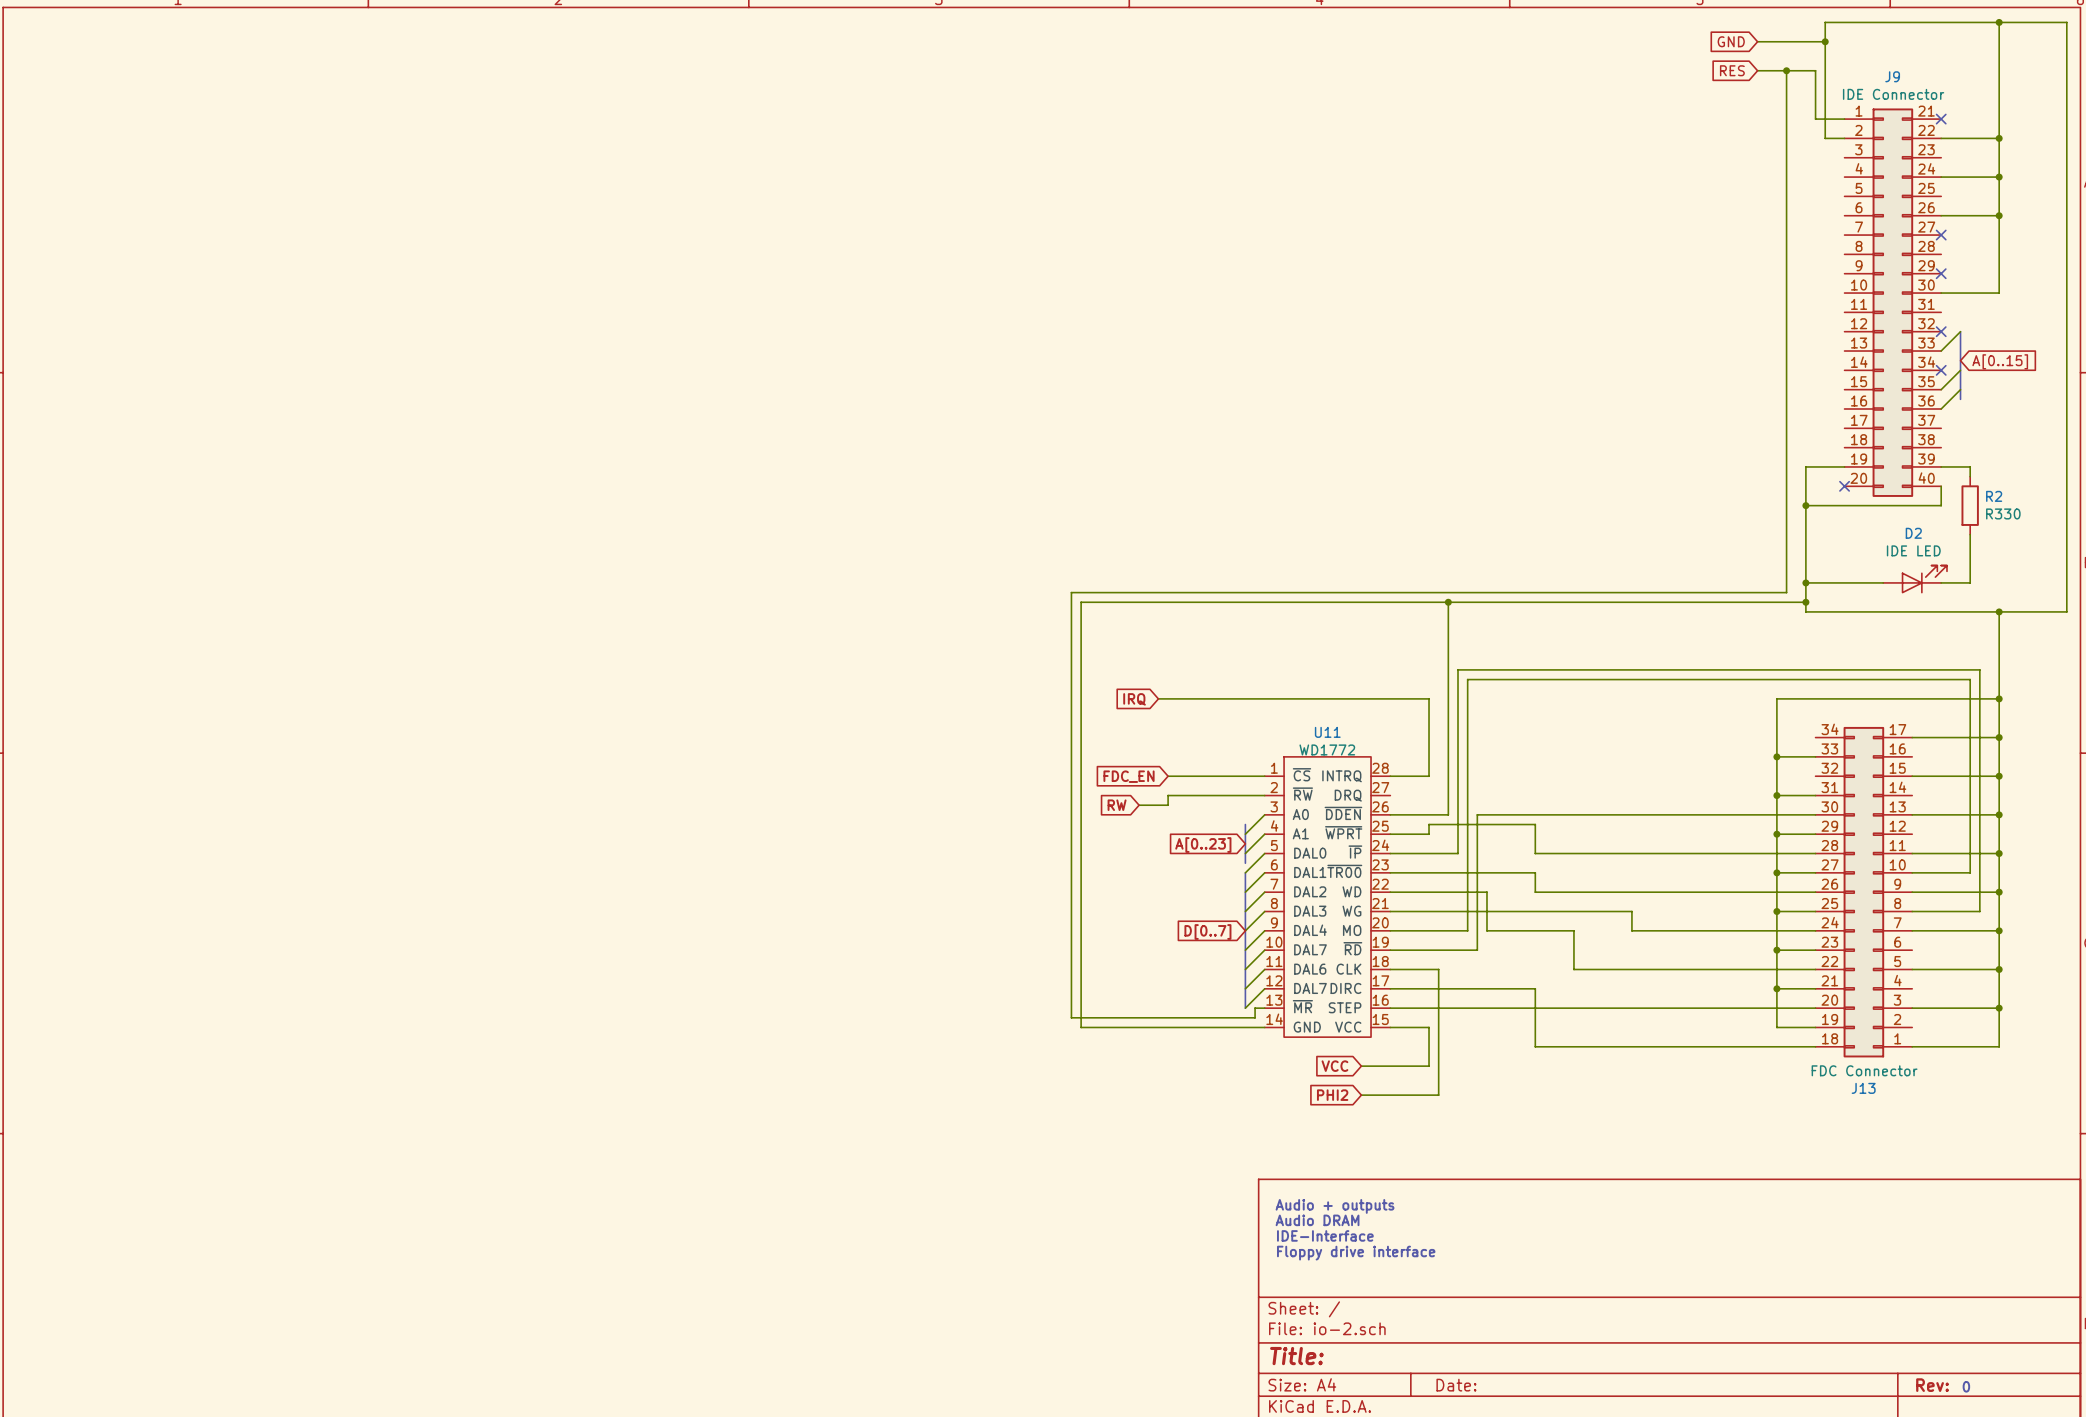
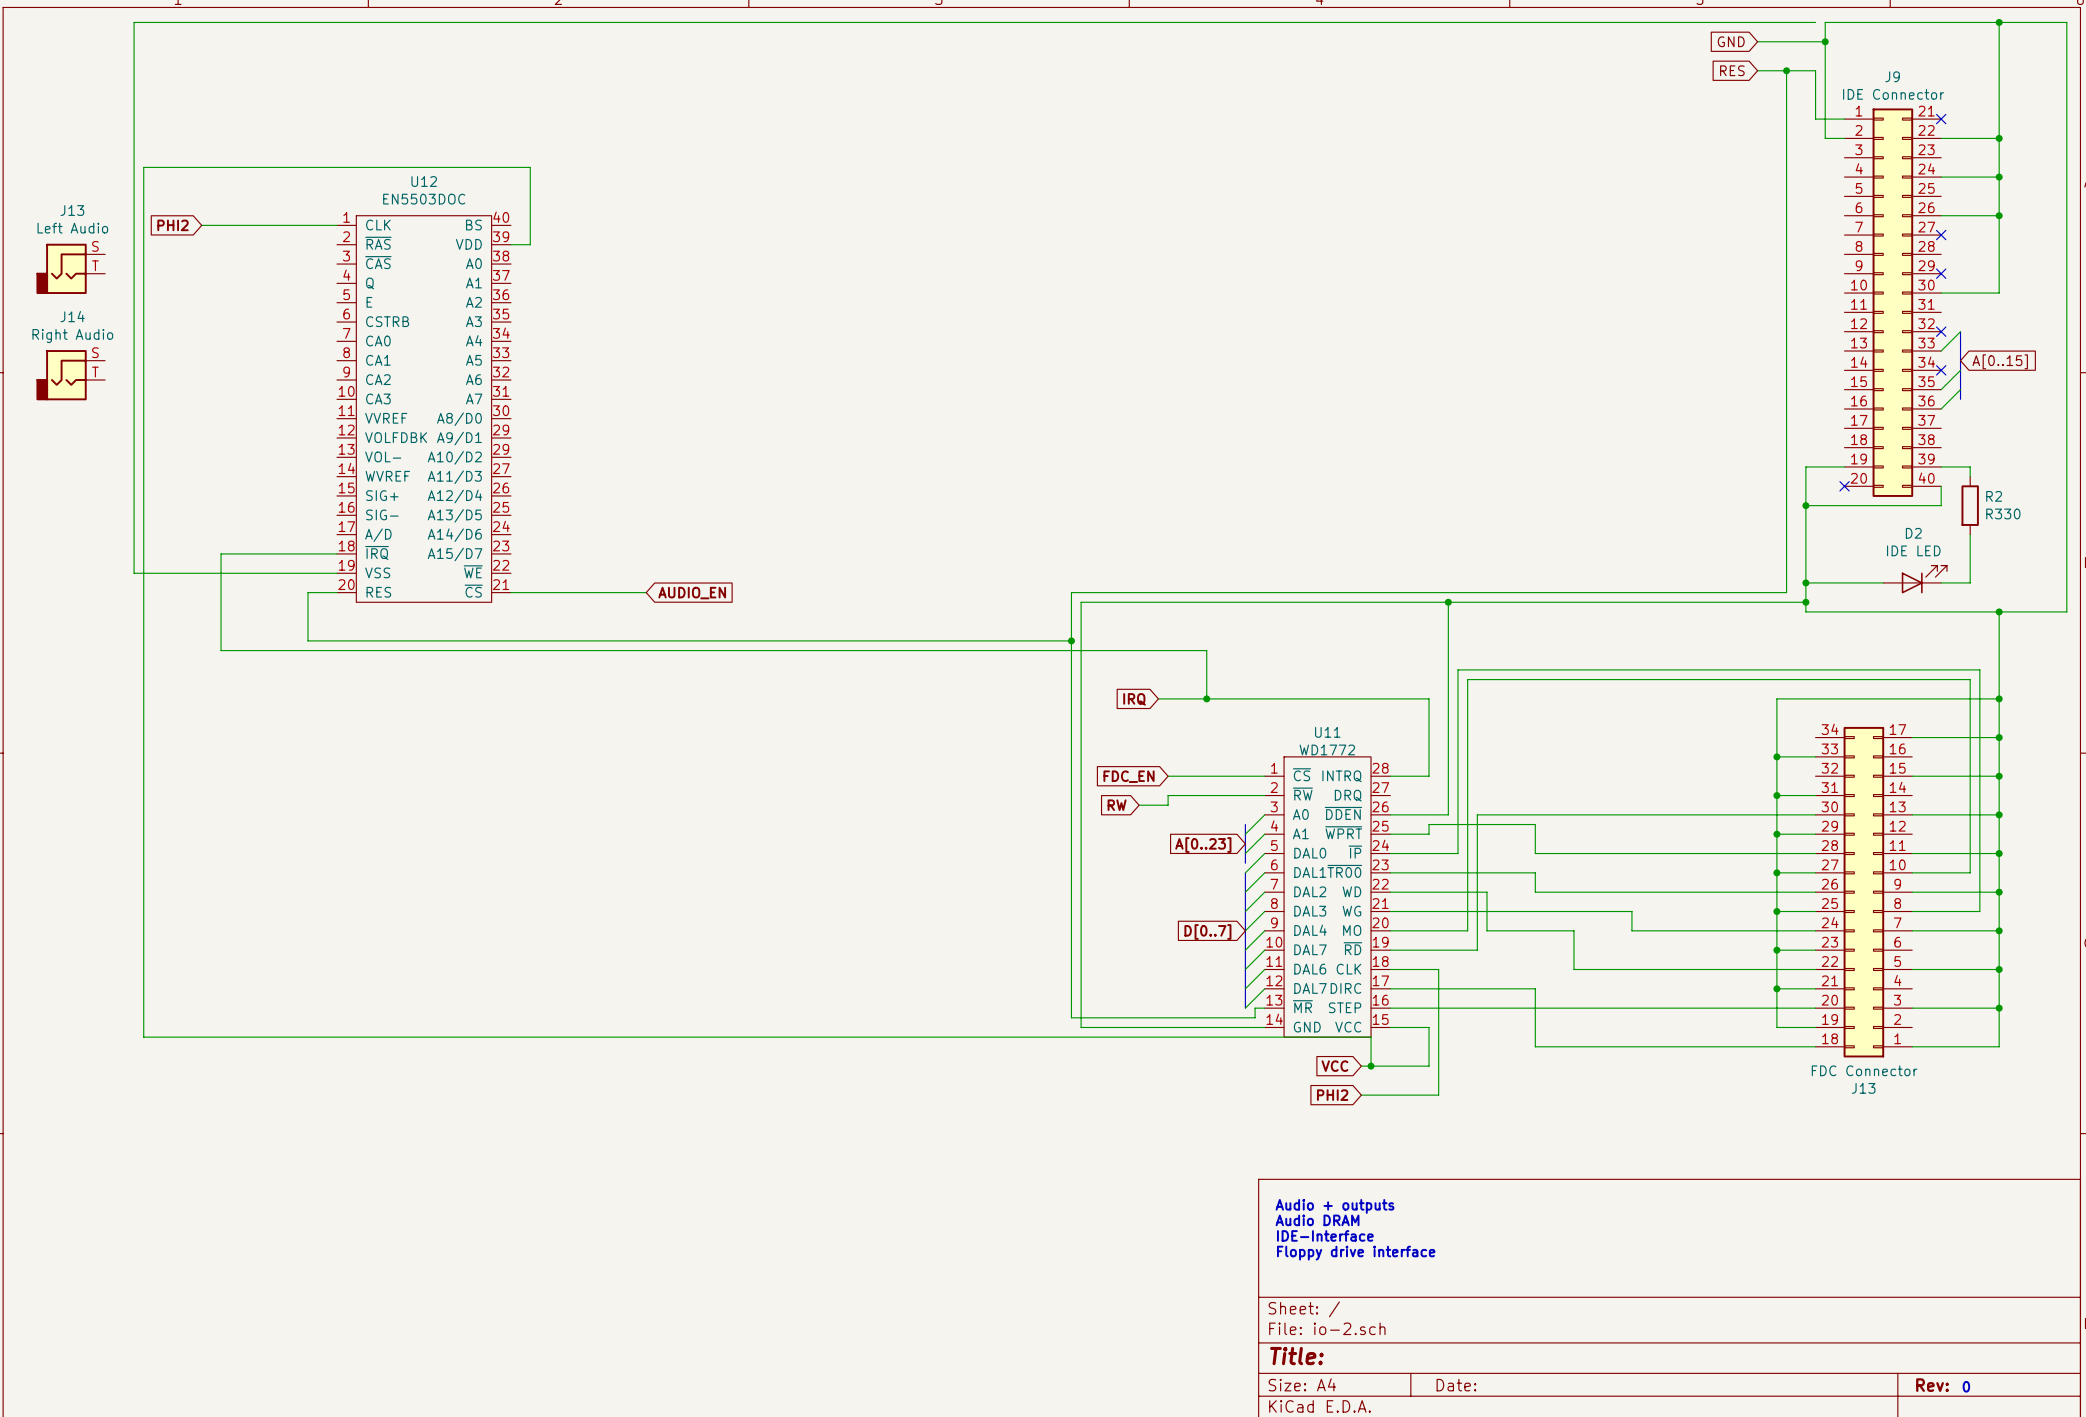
wire: none -> (1815, 22) (134, 22) (134, 573) (337, 573)
global label: none -> PHI2 (172, 225)
wire: none -> (201, 225) (337, 225)
wire: none -> (510, 244) (530, 244) (530, 167) (143, 167) (143, 1037) (1371, 1037) (1371, 1066)
J13: none -> Left Audio (70, 268)
J14: none -> Right Audio (70, 375)
U12: none -> EN5503DOC (423, 408)
wire: none -> (337, 553) (221, 553) (221, 650) (1206, 650) (1206, 698)
wire: none -> (337, 592) (308, 592) (308, 640) (1071, 640)
wire: none -> (510, 592) (646, 592)
global label: none -> AUDIO_EN (692, 593)
junction: none -> (1071, 640)
junction: none -> (1206, 698)
junction: none -> (1371, 1066)

